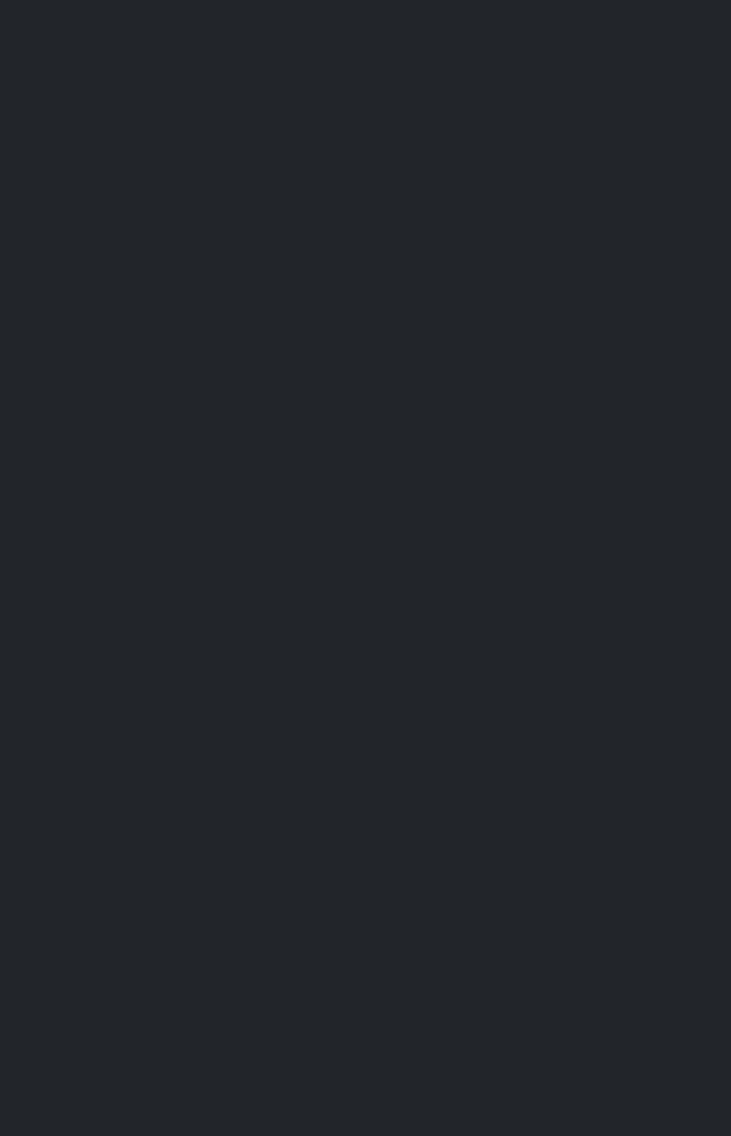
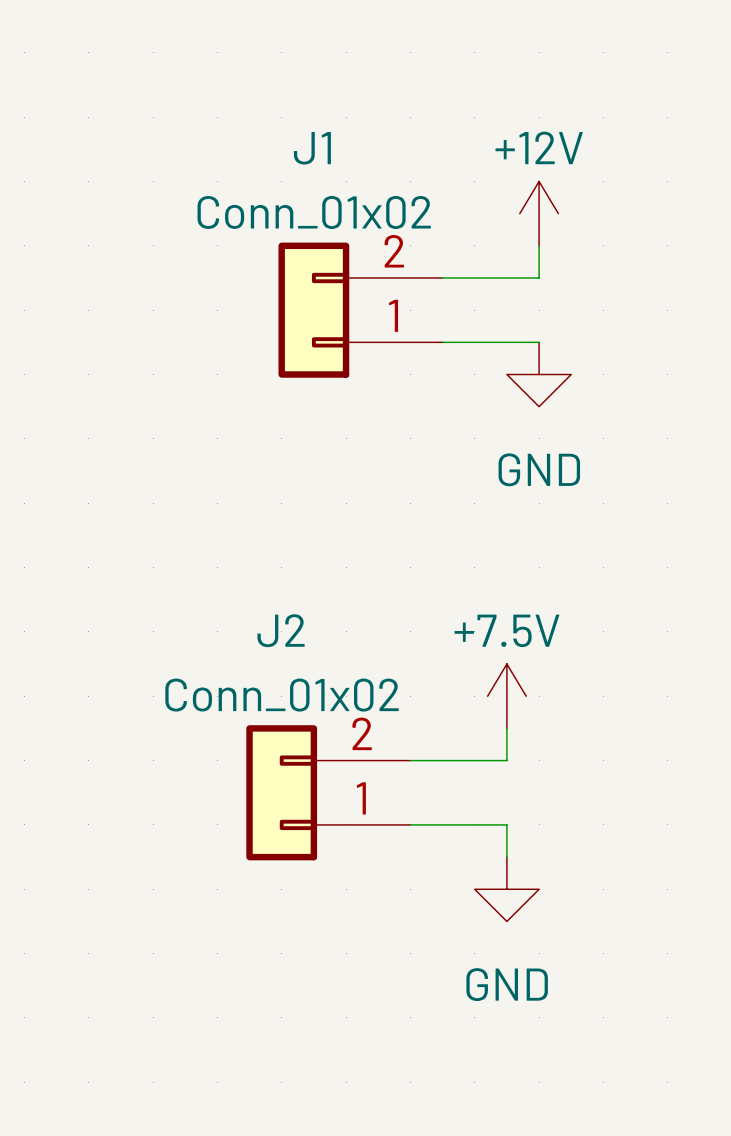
power symbol: none -> +12V (539, 213)
wire: none -> (539, 245) (539, 278) (442, 278)
J1: none -> Conn_01x02 (360, 310)
wire: none -> (442, 342) (539, 342)
power symbol: none -> GND (539, 374)
power symbol: none -> +7.5V (506, 696)
wire: none -> (506, 728) (506, 760) (410, 760)
J2: none -> Conn_01x02 (328, 792)
wire: none -> (410, 824) (506, 824) (506, 857)
power symbol: none -> GND (506, 889)

